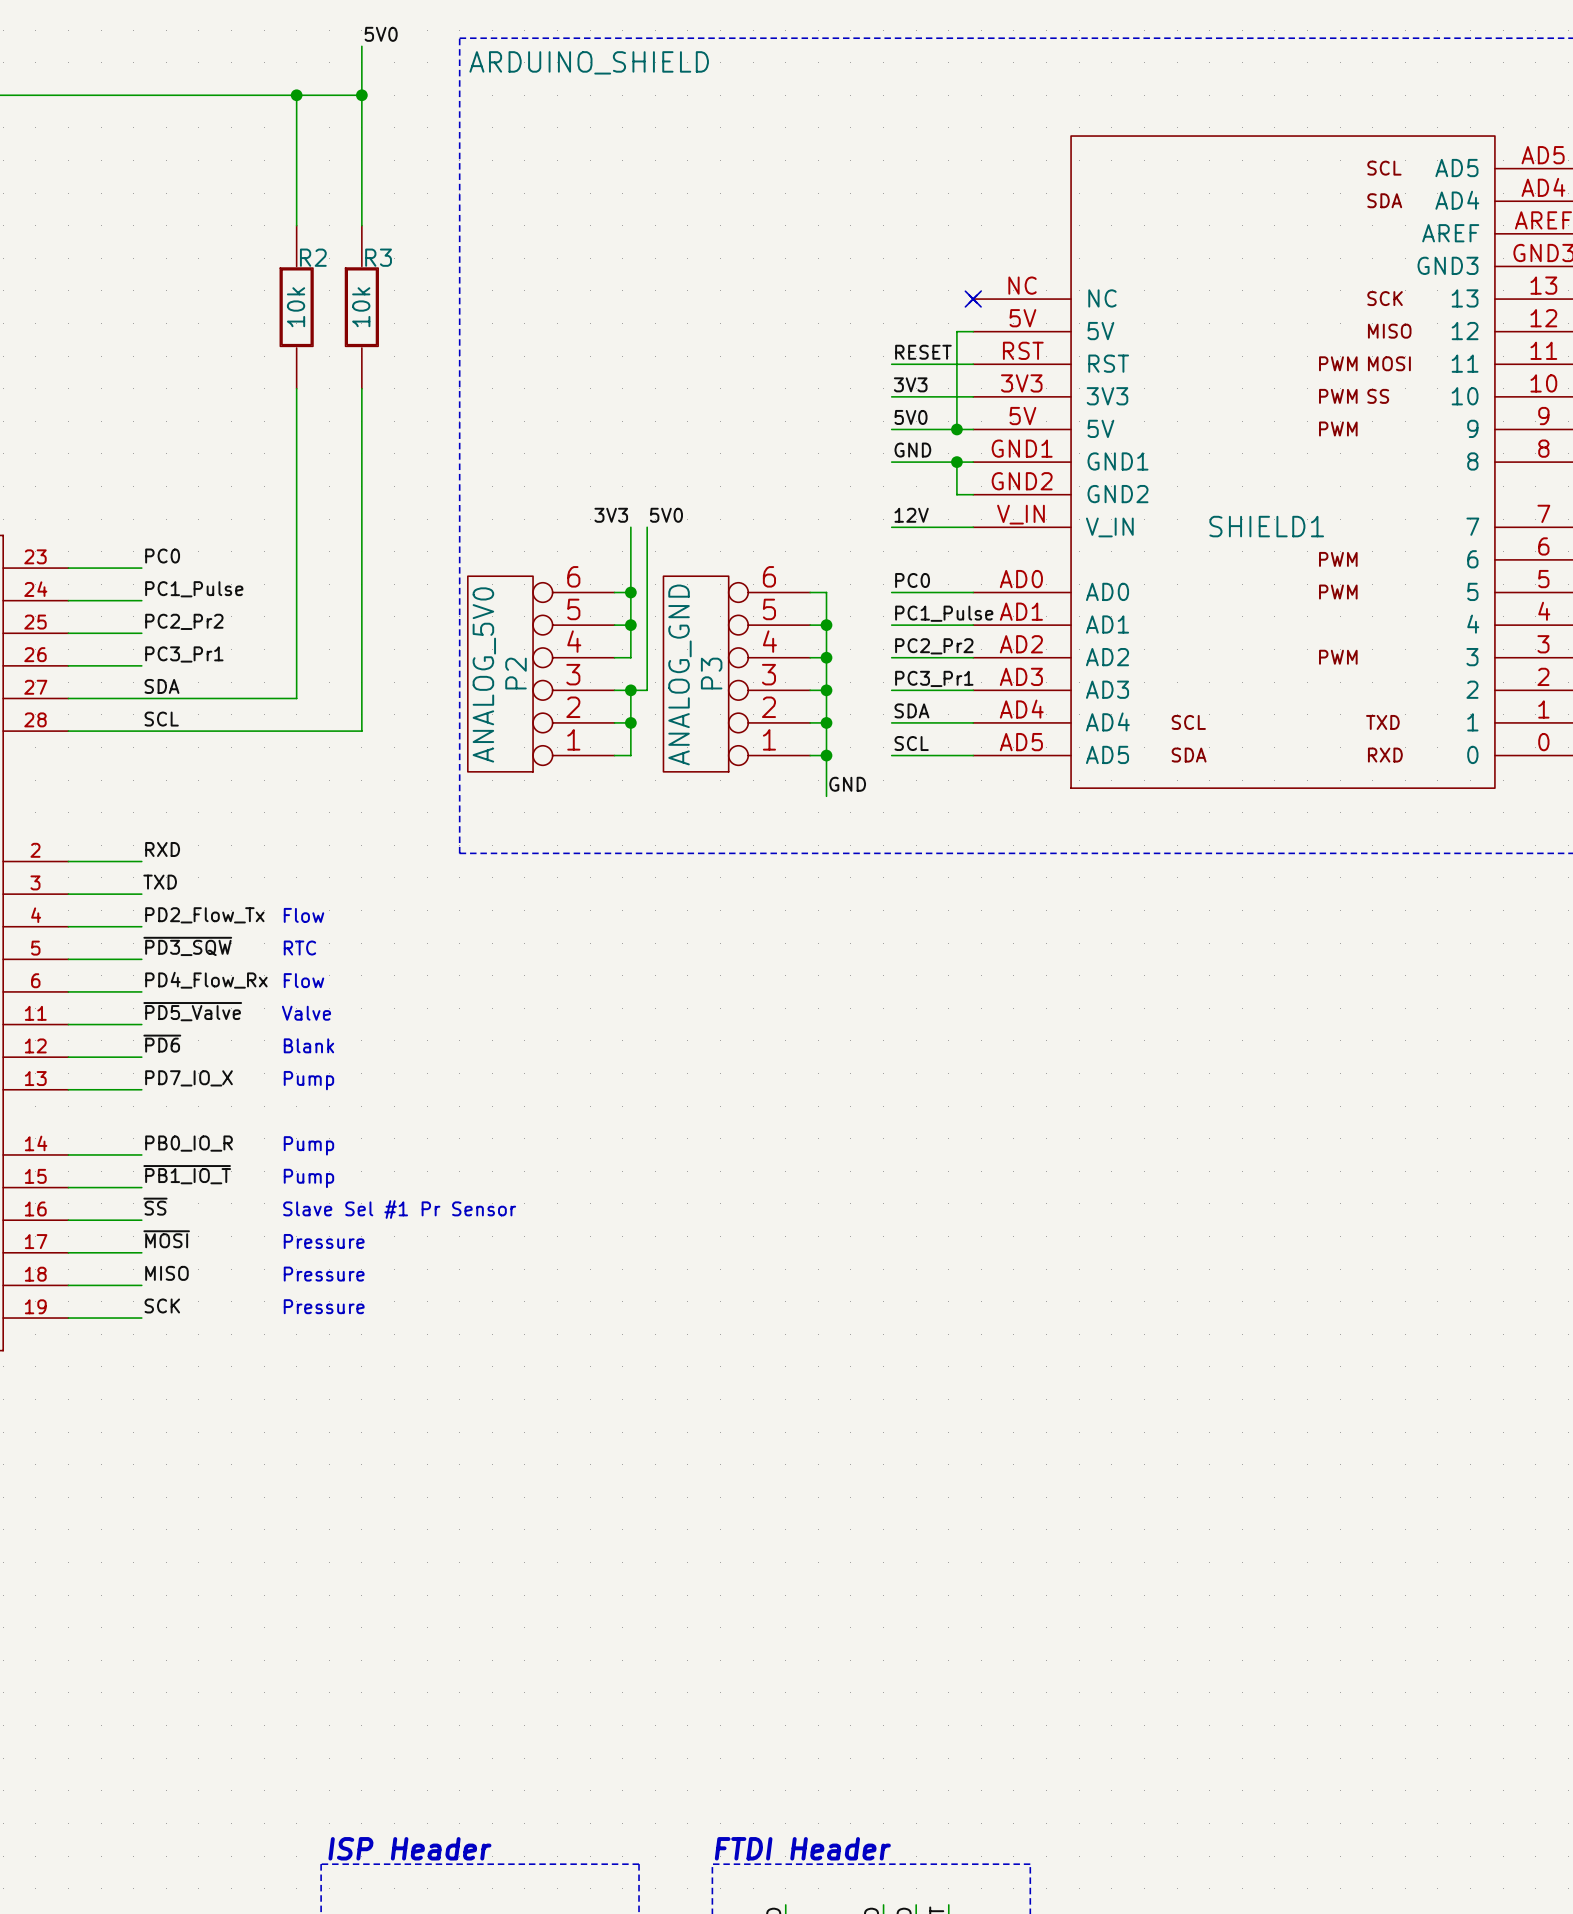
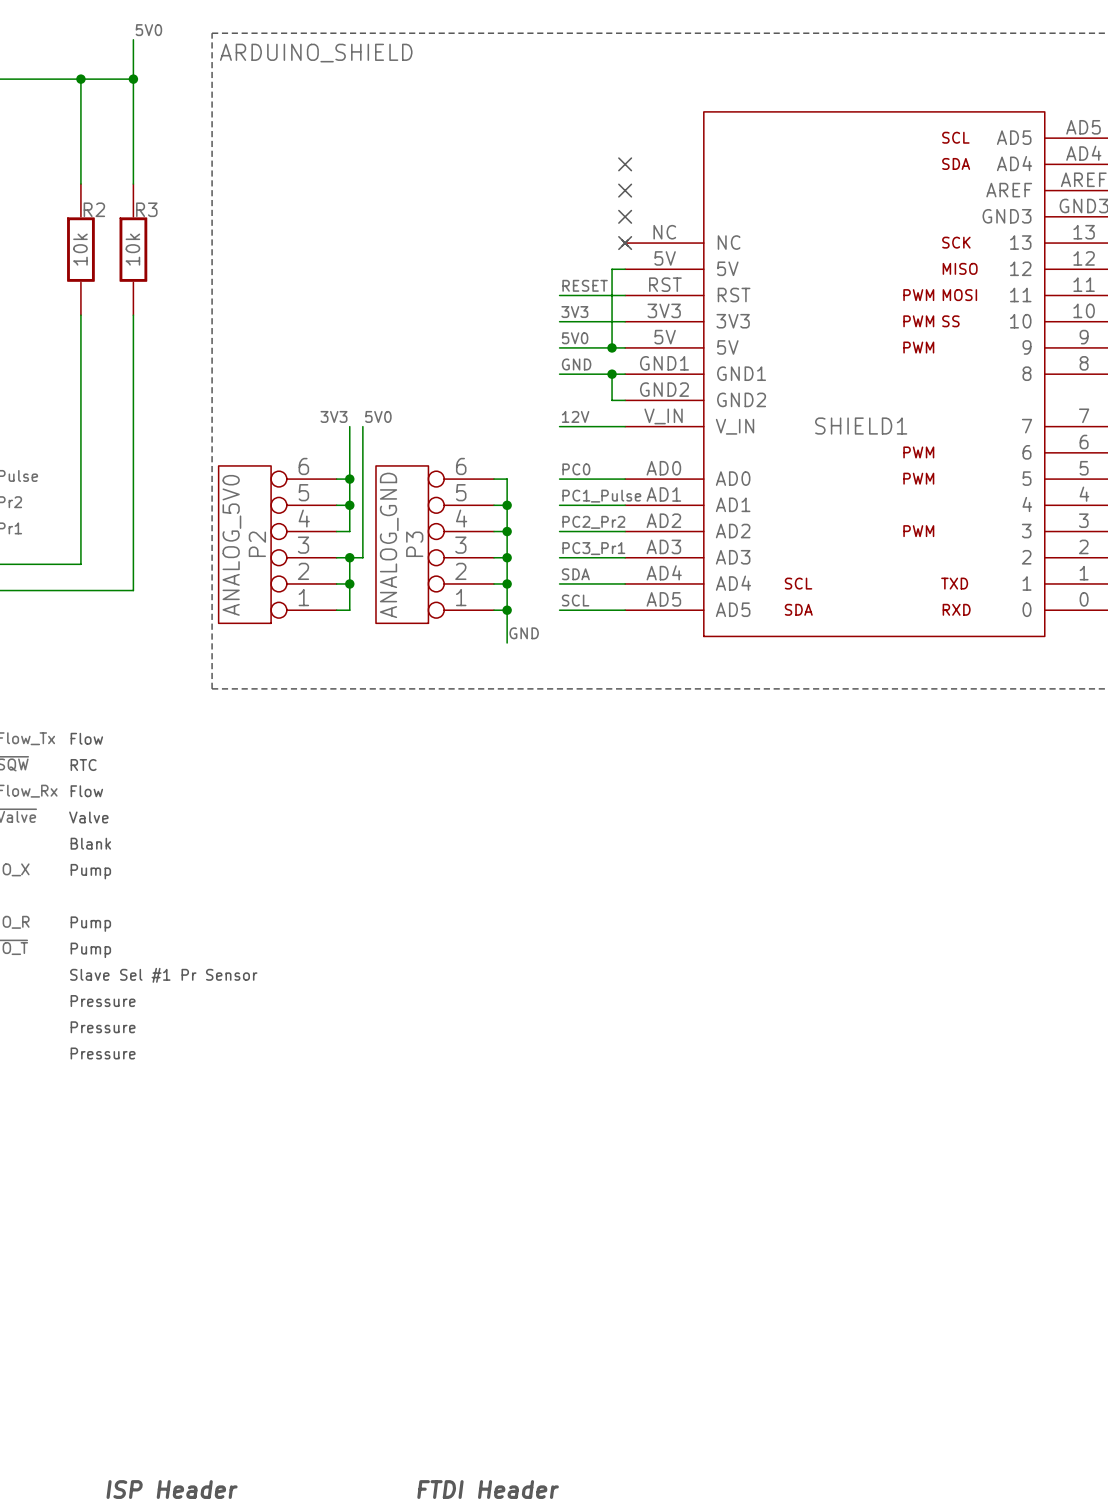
no-connect mark: none -> (625, 164)
no-connect mark: none -> (625, 190)
no-connect mark: none -> (625, 216)

